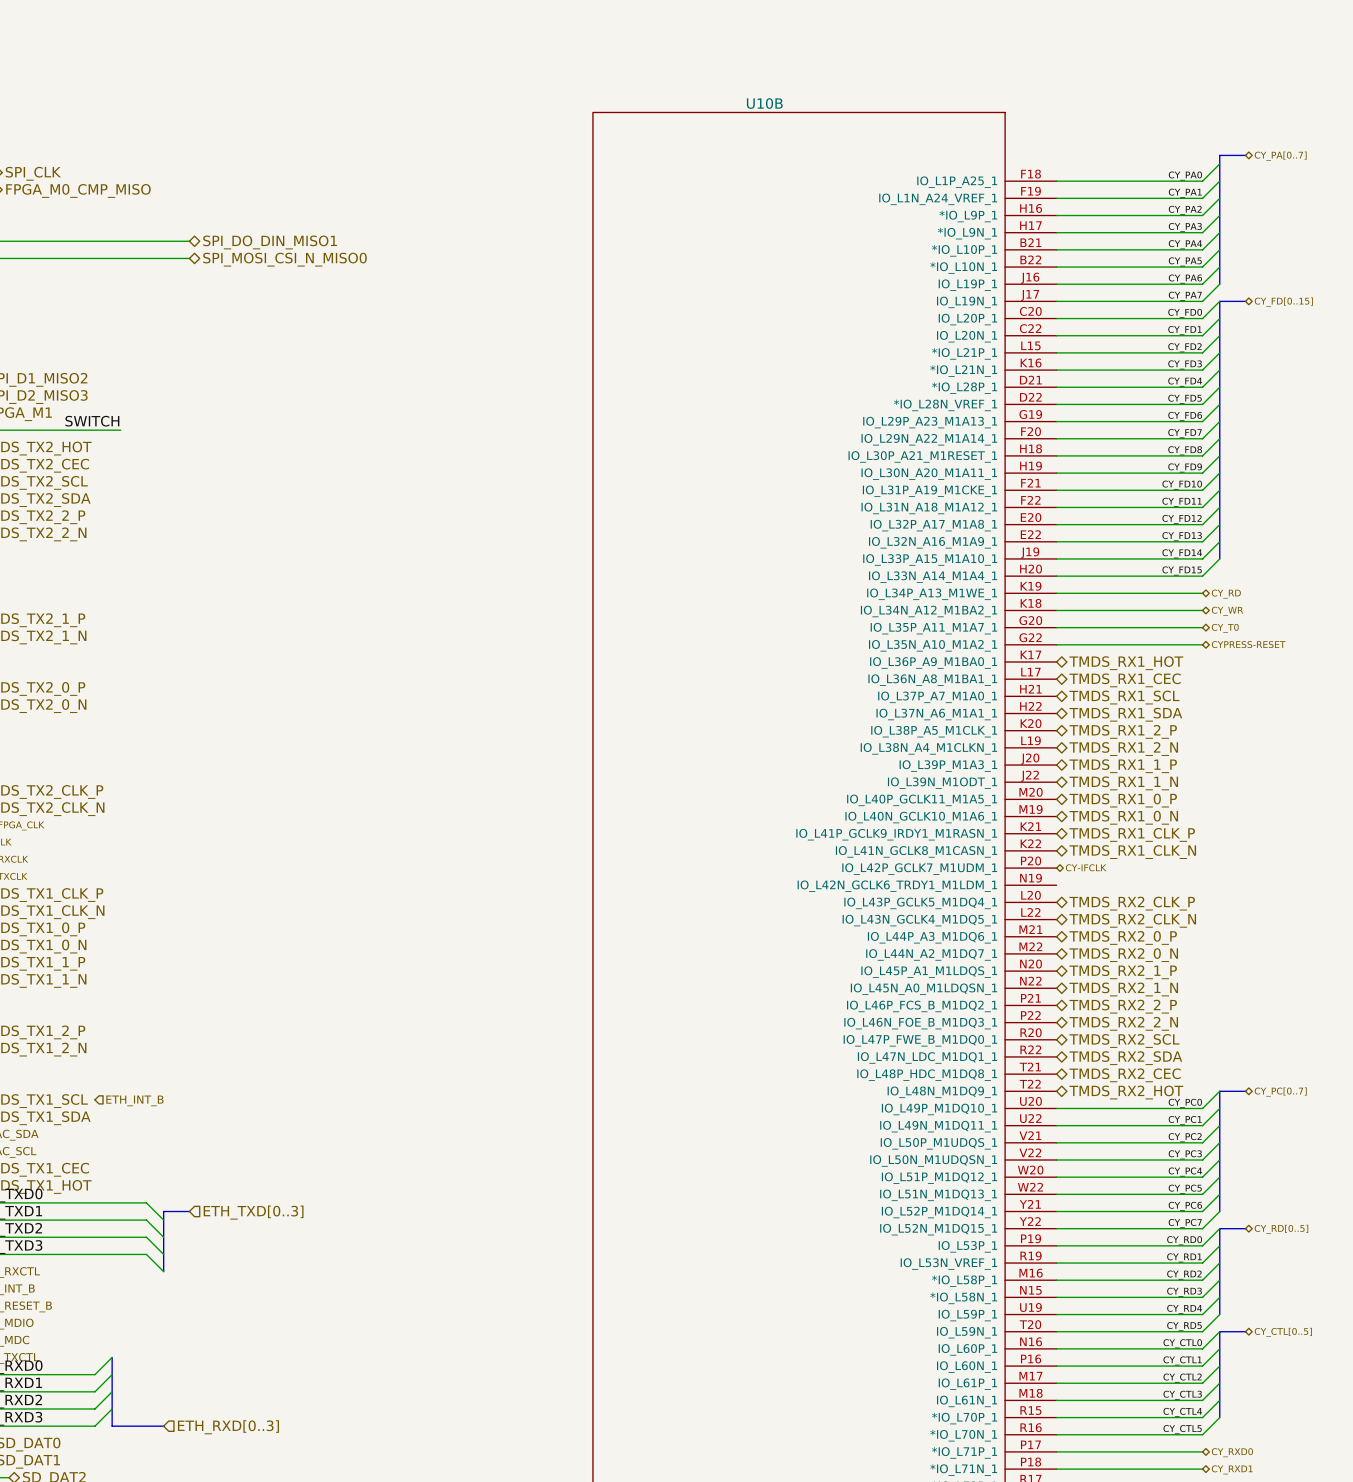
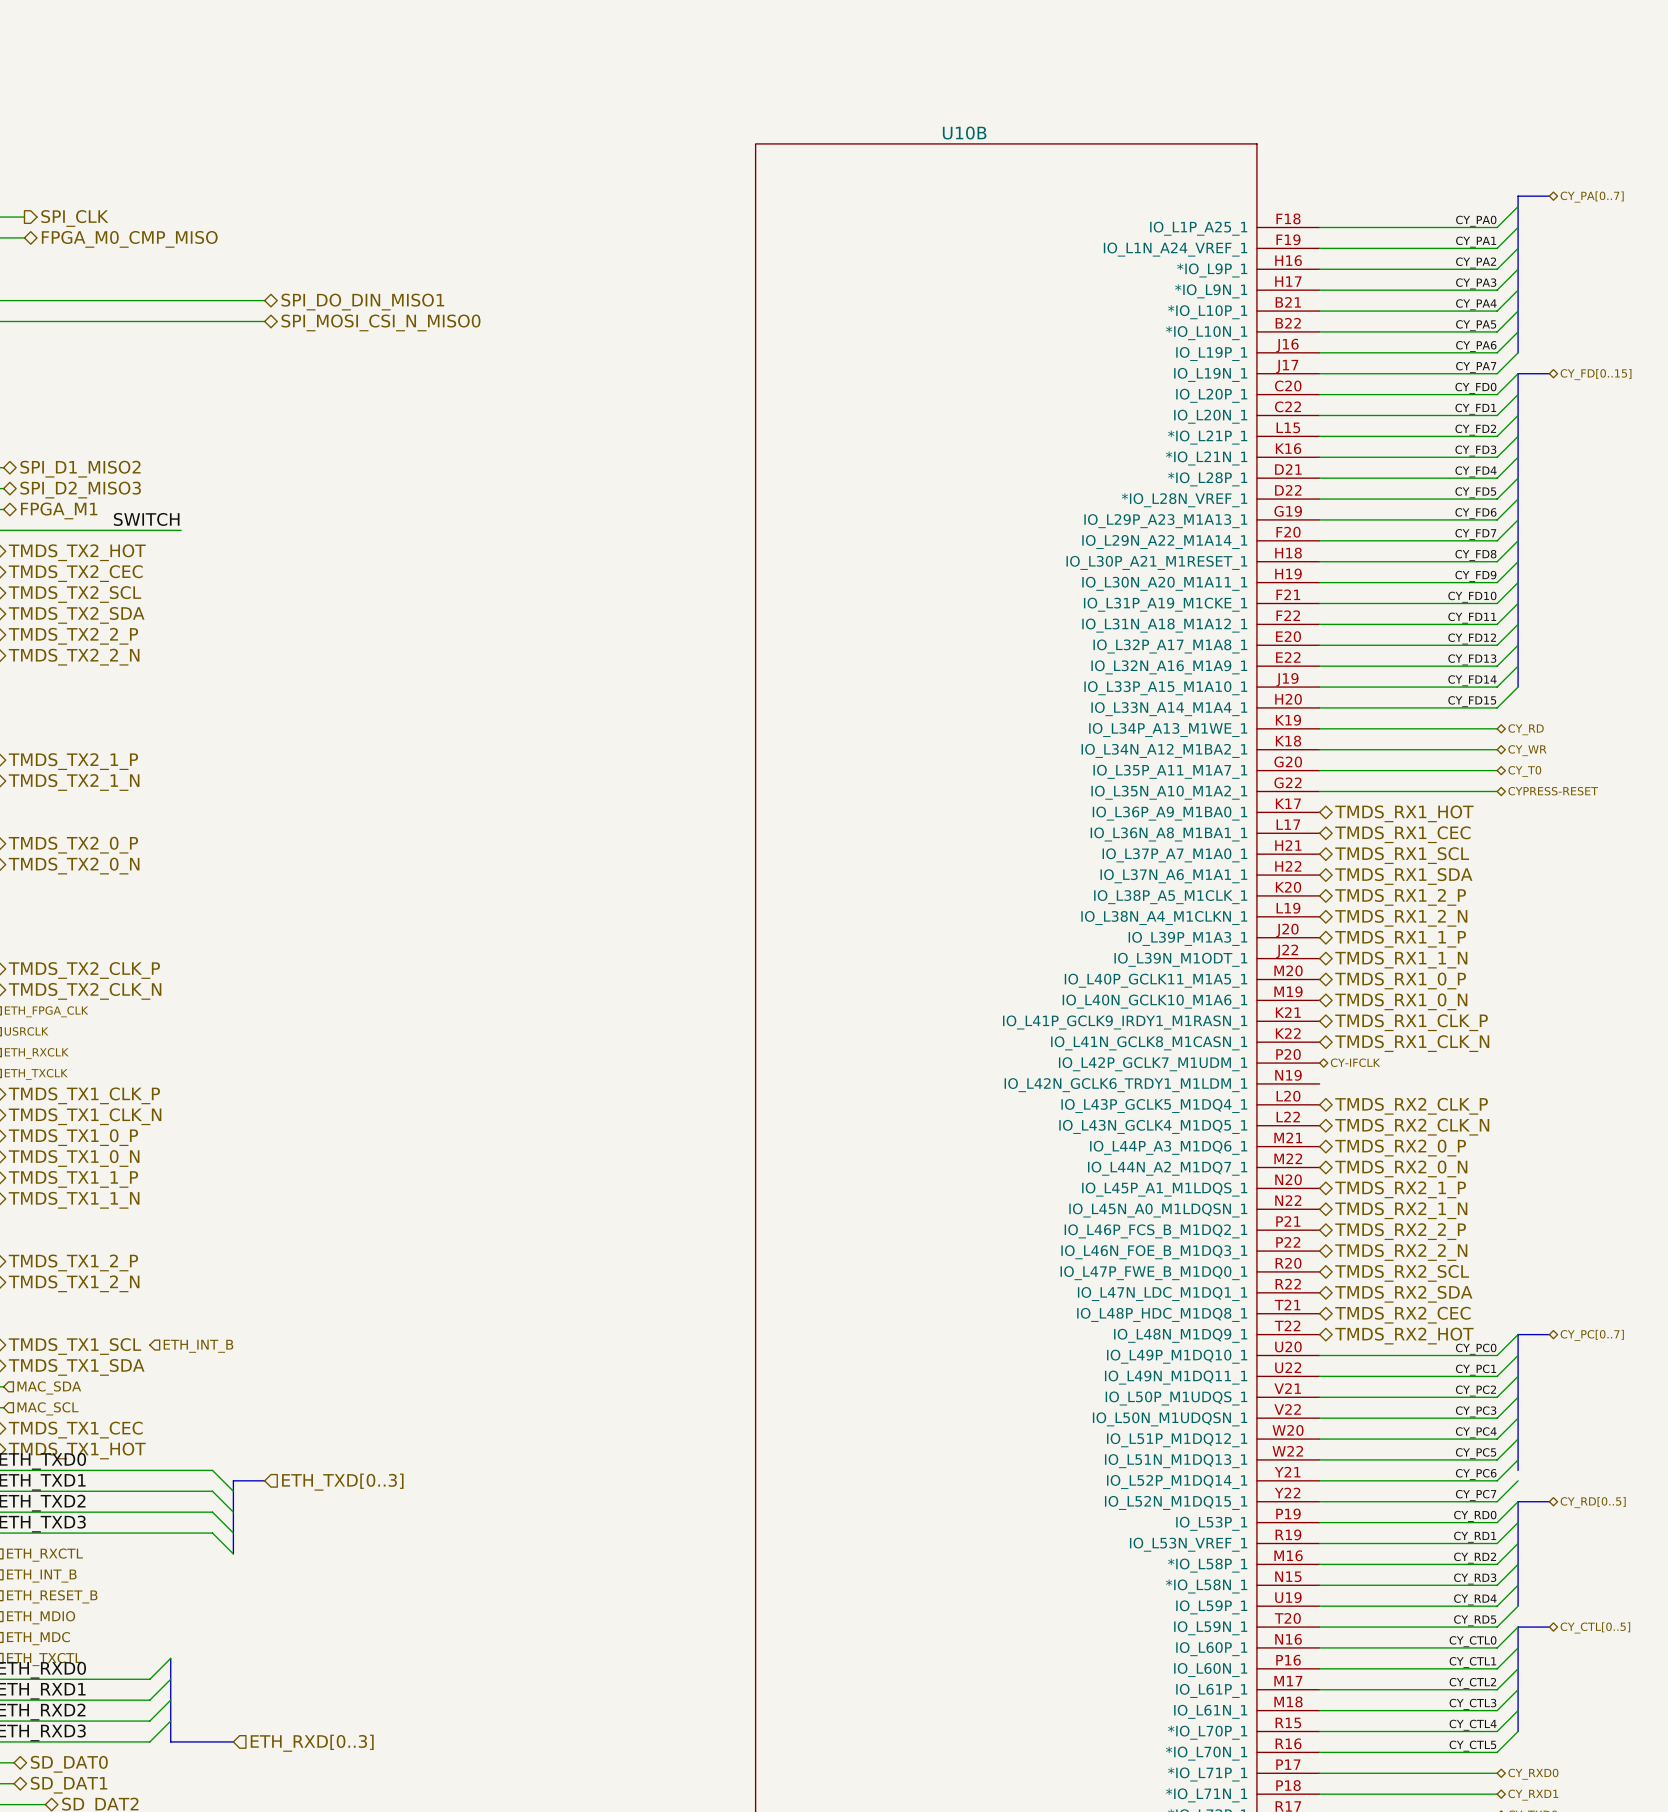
bus: (1219, 1202) (1219, 1211) -> none

